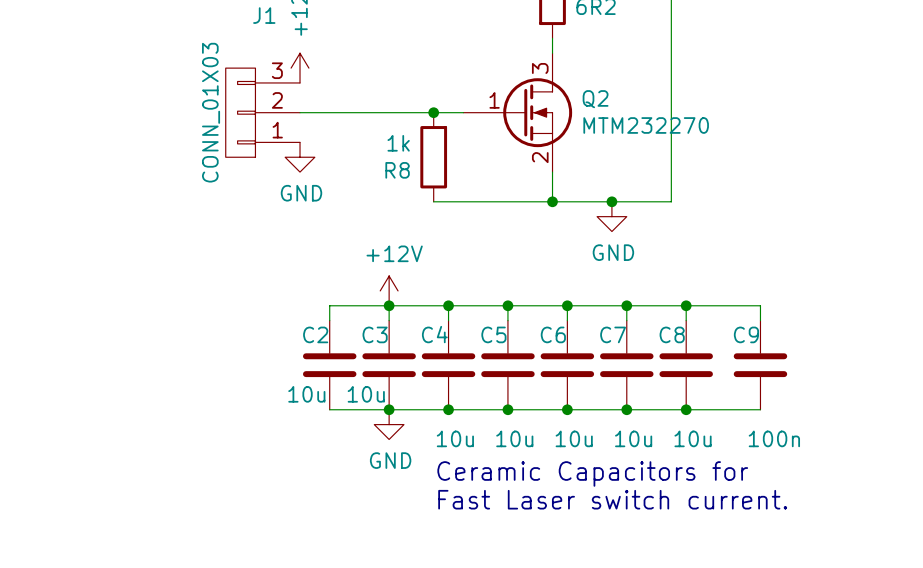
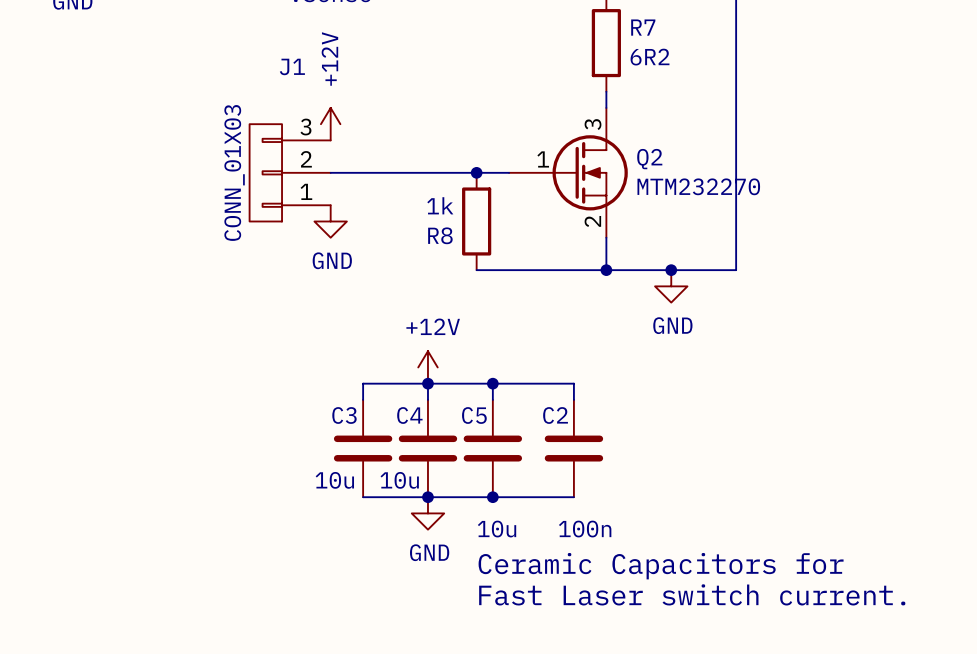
wire: (507, 305) (507, 320) -> none
junction: (507, 305) -> none
wire: (522, 305) (760, 305) (760, 320) -> (573, 383) (573, 399)
wire: (567, 305) (567, 320) -> none
junction: (567, 305) -> none
wire: (626, 305) (626, 320) -> none
junction: (626, 305) -> none
wire: (686, 305) (686, 320) -> none
junction: (686, 305) -> none
C2 name: C2 (315, 334) -> C3 (344, 415)
C3 name: C3 (375, 334) -> C4 (409, 415)
C4 name: C4 (434, 334) -> C5 (474, 415)
C5: 10u (507, 365) -> none
C2: none -> 100n (573, 448)
C6: 10u (567, 365) -> none
C7: 10u (626, 365) -> none
C8: 10u (686, 365) -> none
C9: 100n (760, 365) -> none
junction: (507, 409) -> none
wire: (522, 409) (760, 409) -> none
junction: (567, 409) -> none
junction: (626, 409) -> none
junction: (686, 409) -> none

